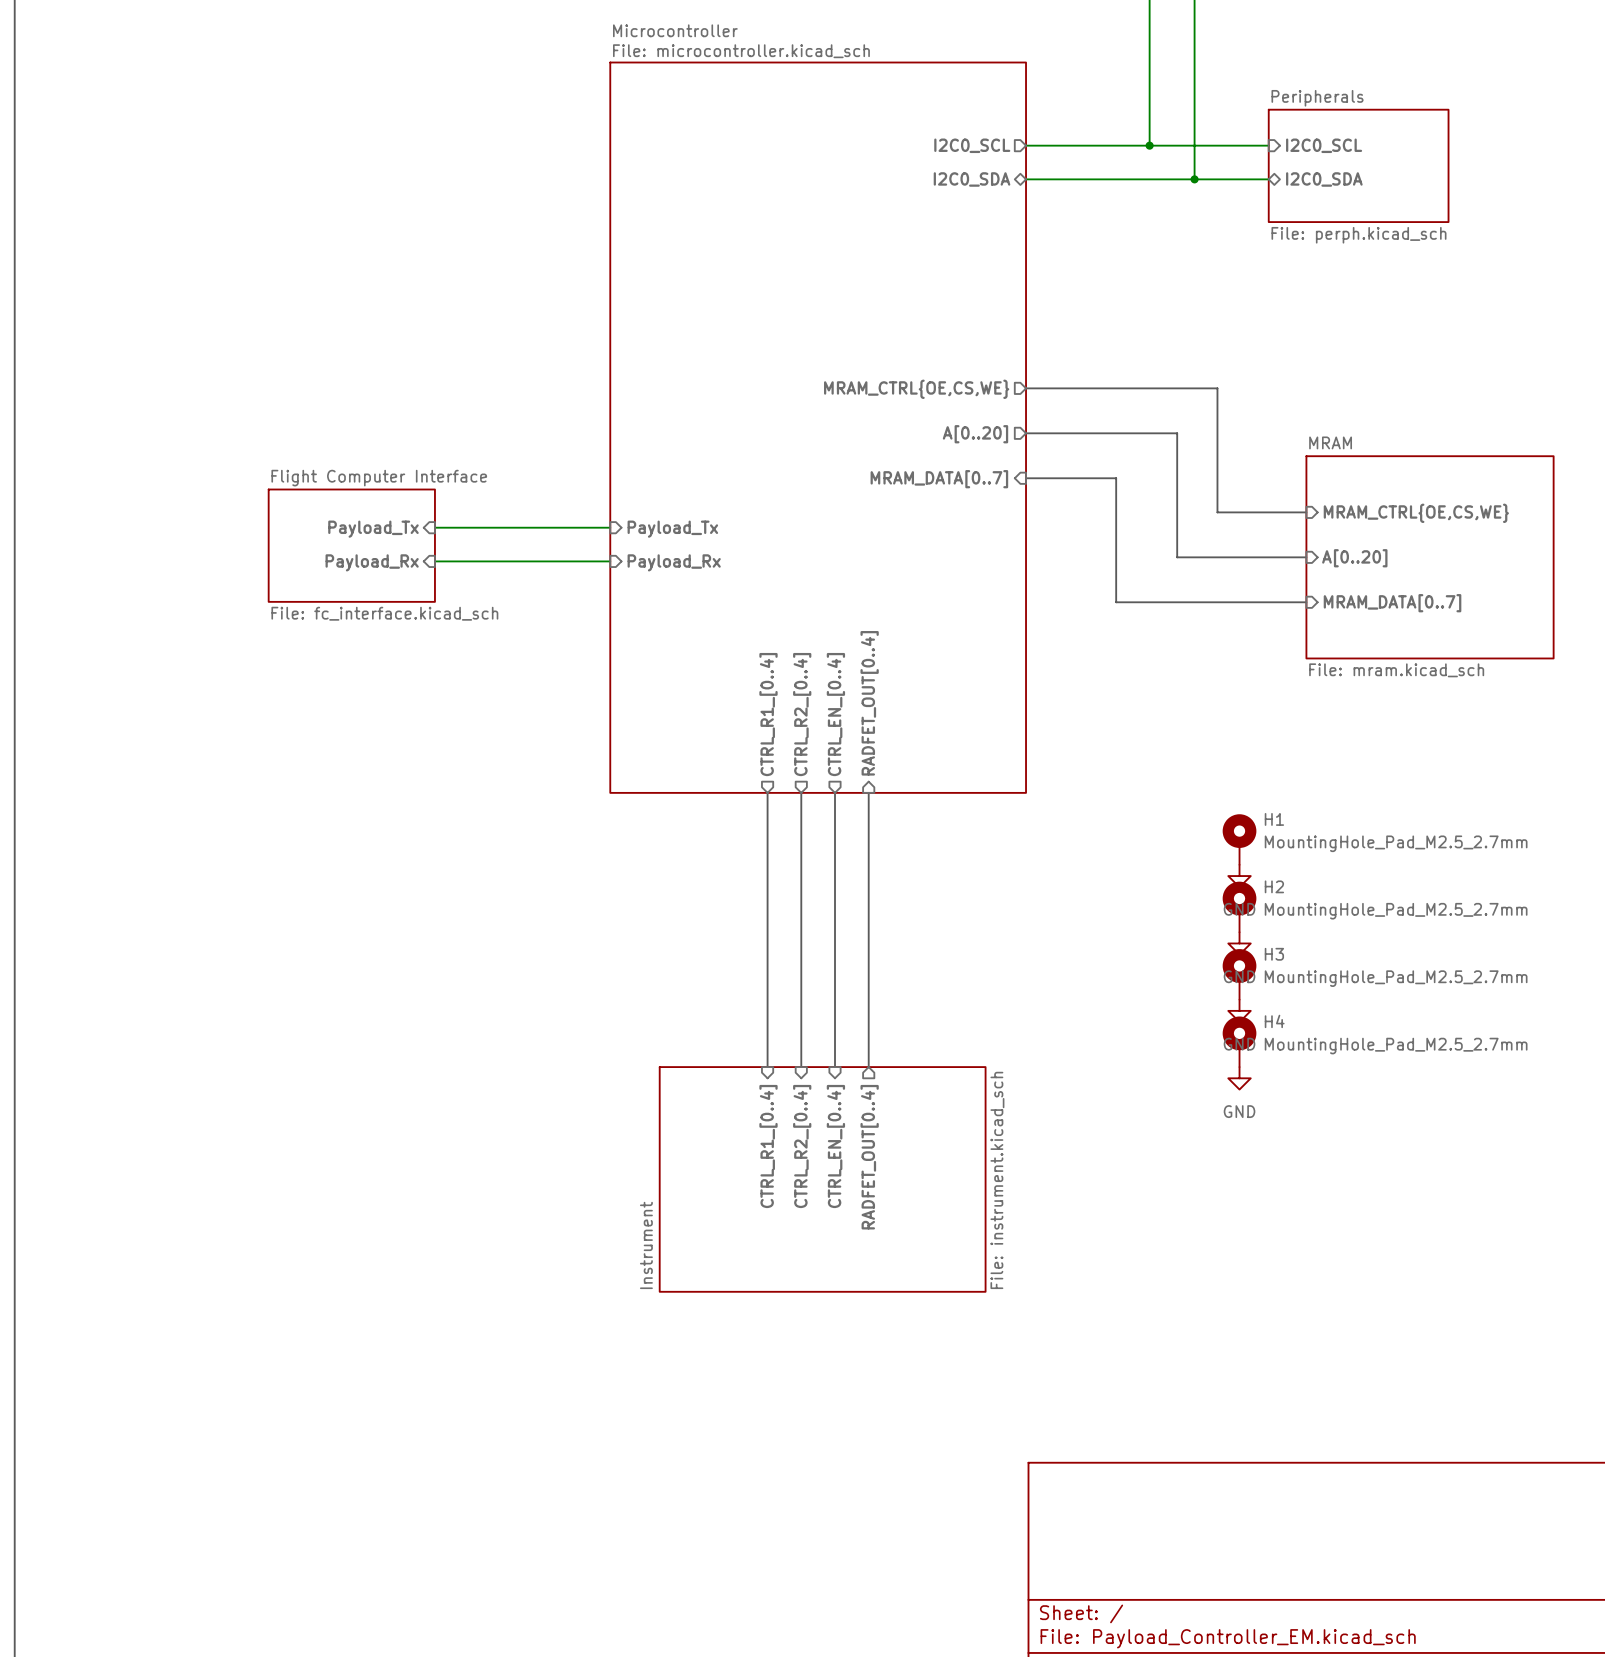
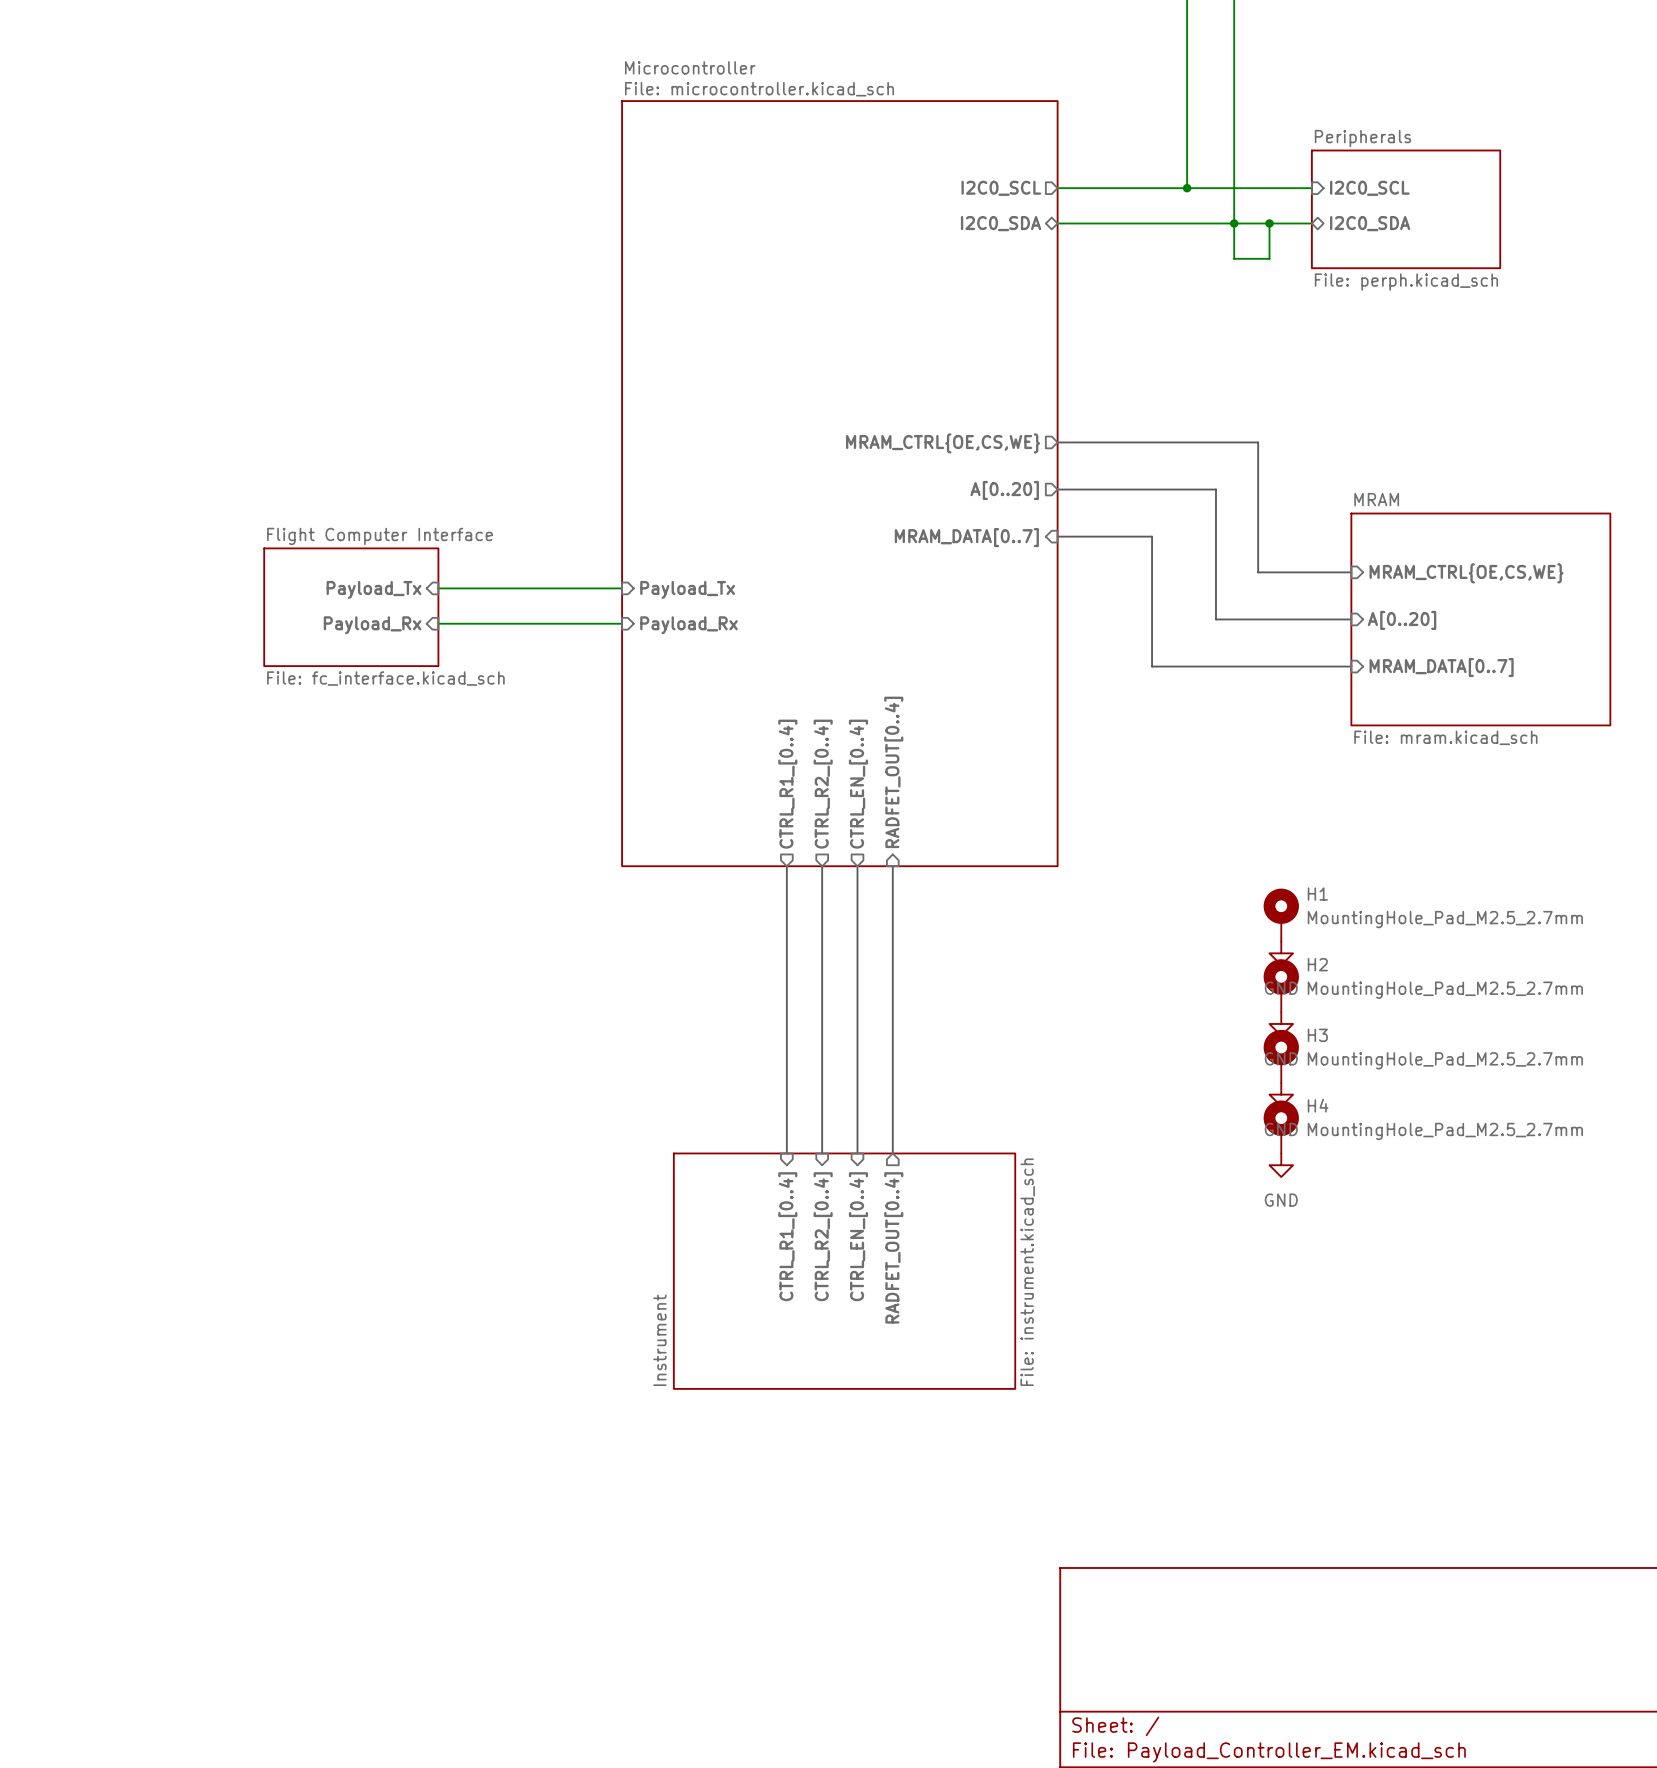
wire: none -> (1234, 223) (1234, 258) (1269, 258) (1269, 223)
junction: none -> (1269, 223)

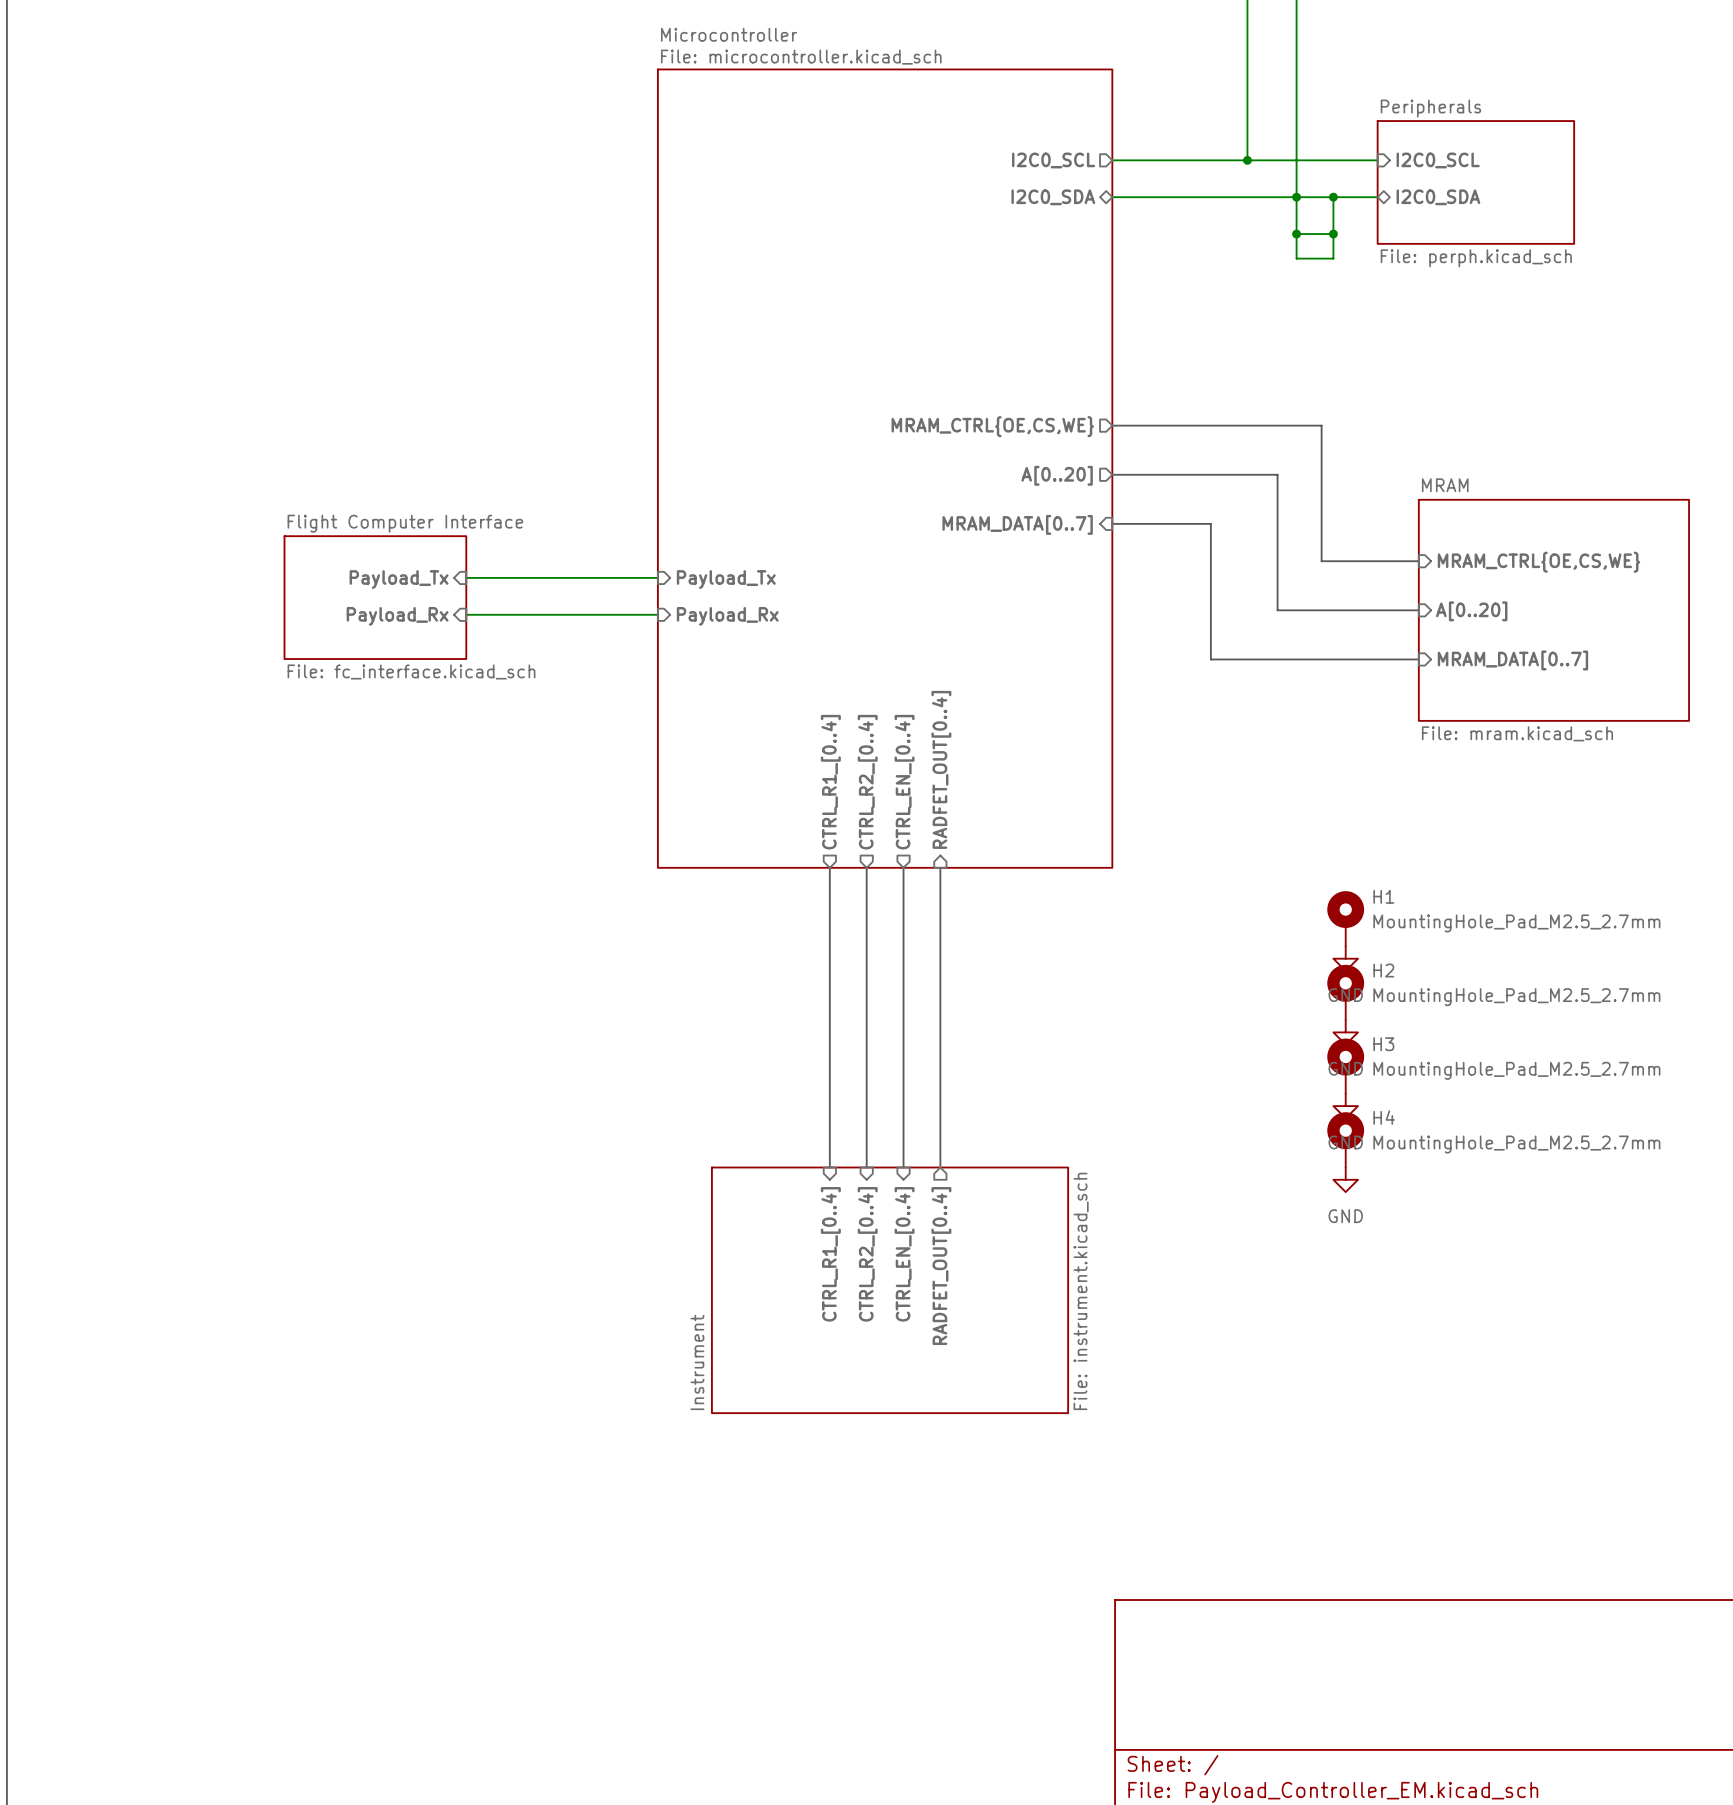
wire: none -> (1296, 234) (1296, 258) (1333, 258) (1333, 234)
junction: none -> (1296, 234)
junction: none -> (1333, 234)

